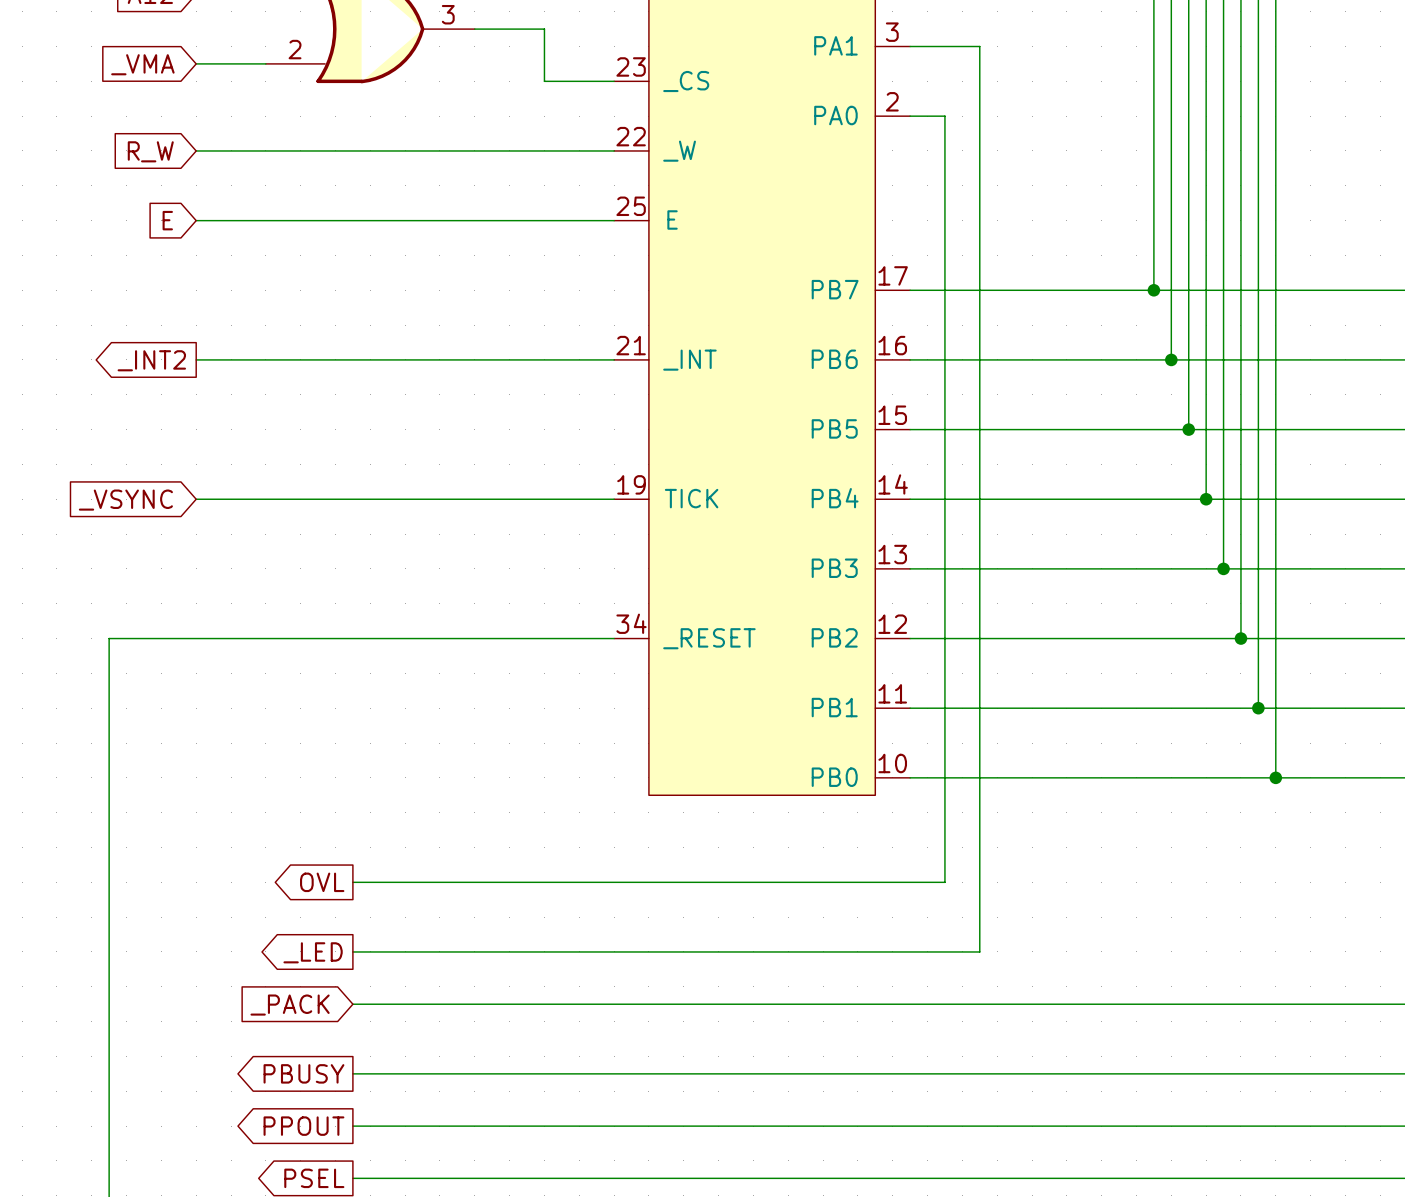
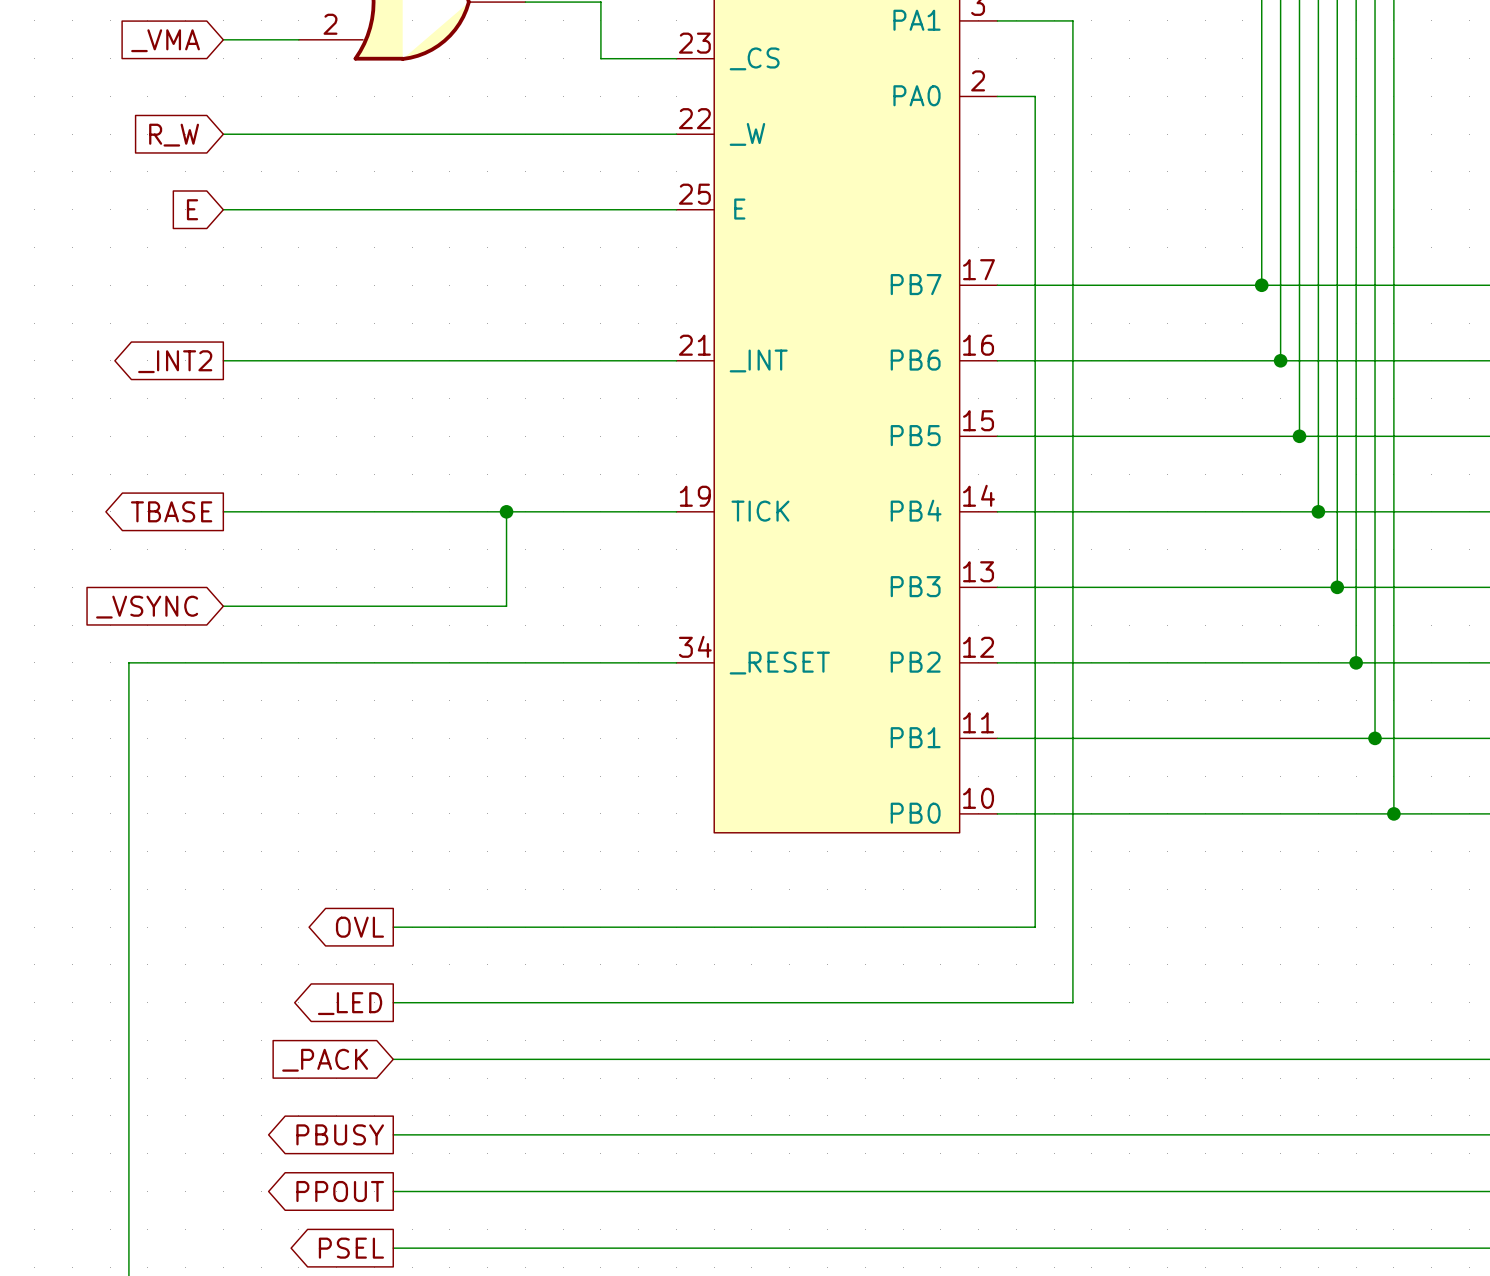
wire: none -> (506, 511) (506, 606) (223, 606)
junction: none -> (506, 511)
global label shape: input (125, 500) -> output (171, 511)
global label: _VSYNC (125, 500) -> TBASE (171, 511)
global label: none -> _VSYNC (147, 607)

